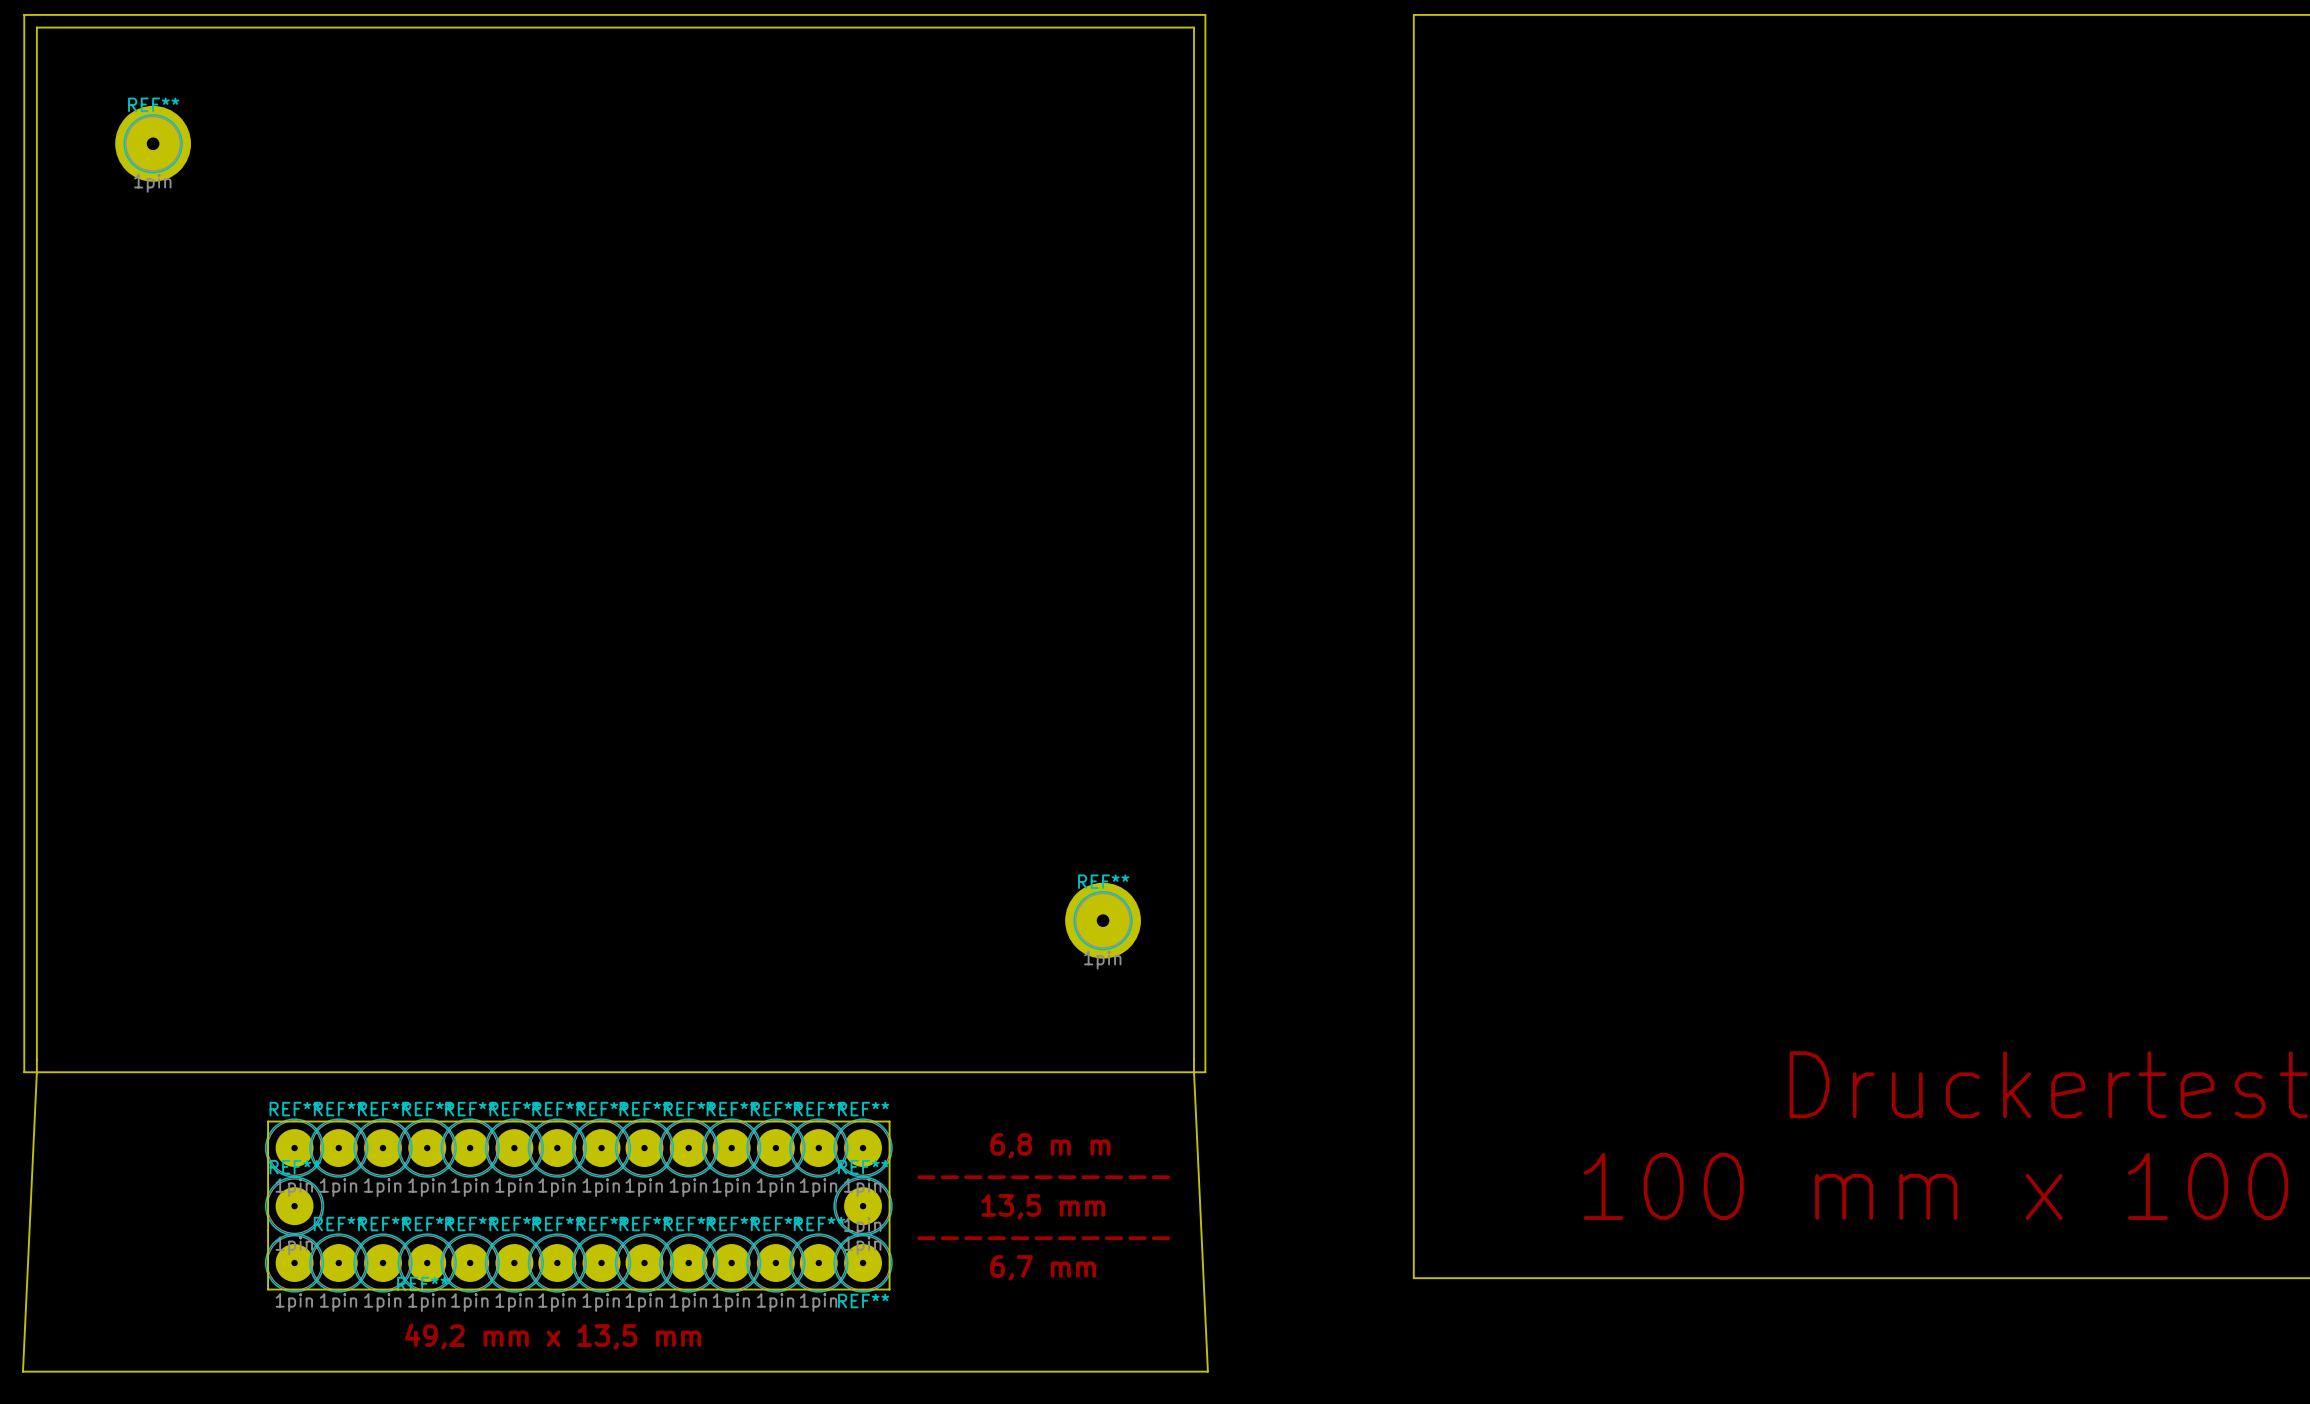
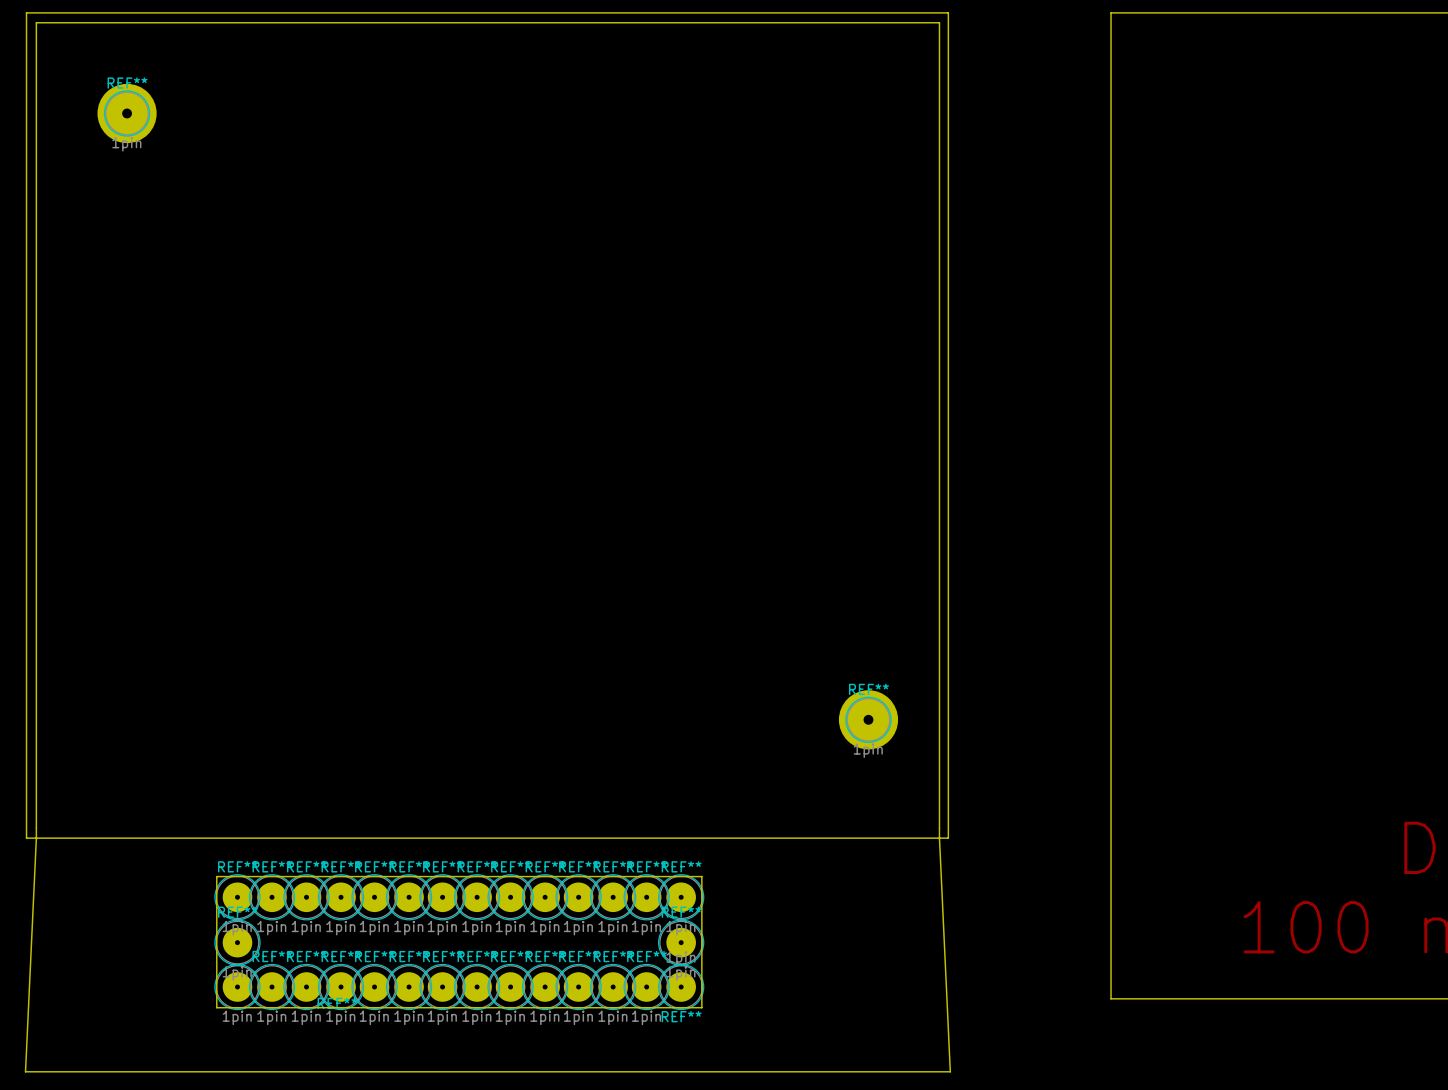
text: 6,8 m m (1050, 1145) -> none
text: ----------- (1043, 1177) -> none
text: 13,5 mm (1043, 1206) -> none
text: ----------- (1043, 1238) -> none
text: 6,7 mm (1043, 1267) -> none
text: 49,2 mm x 13,5 mm (553, 1336) -> none

